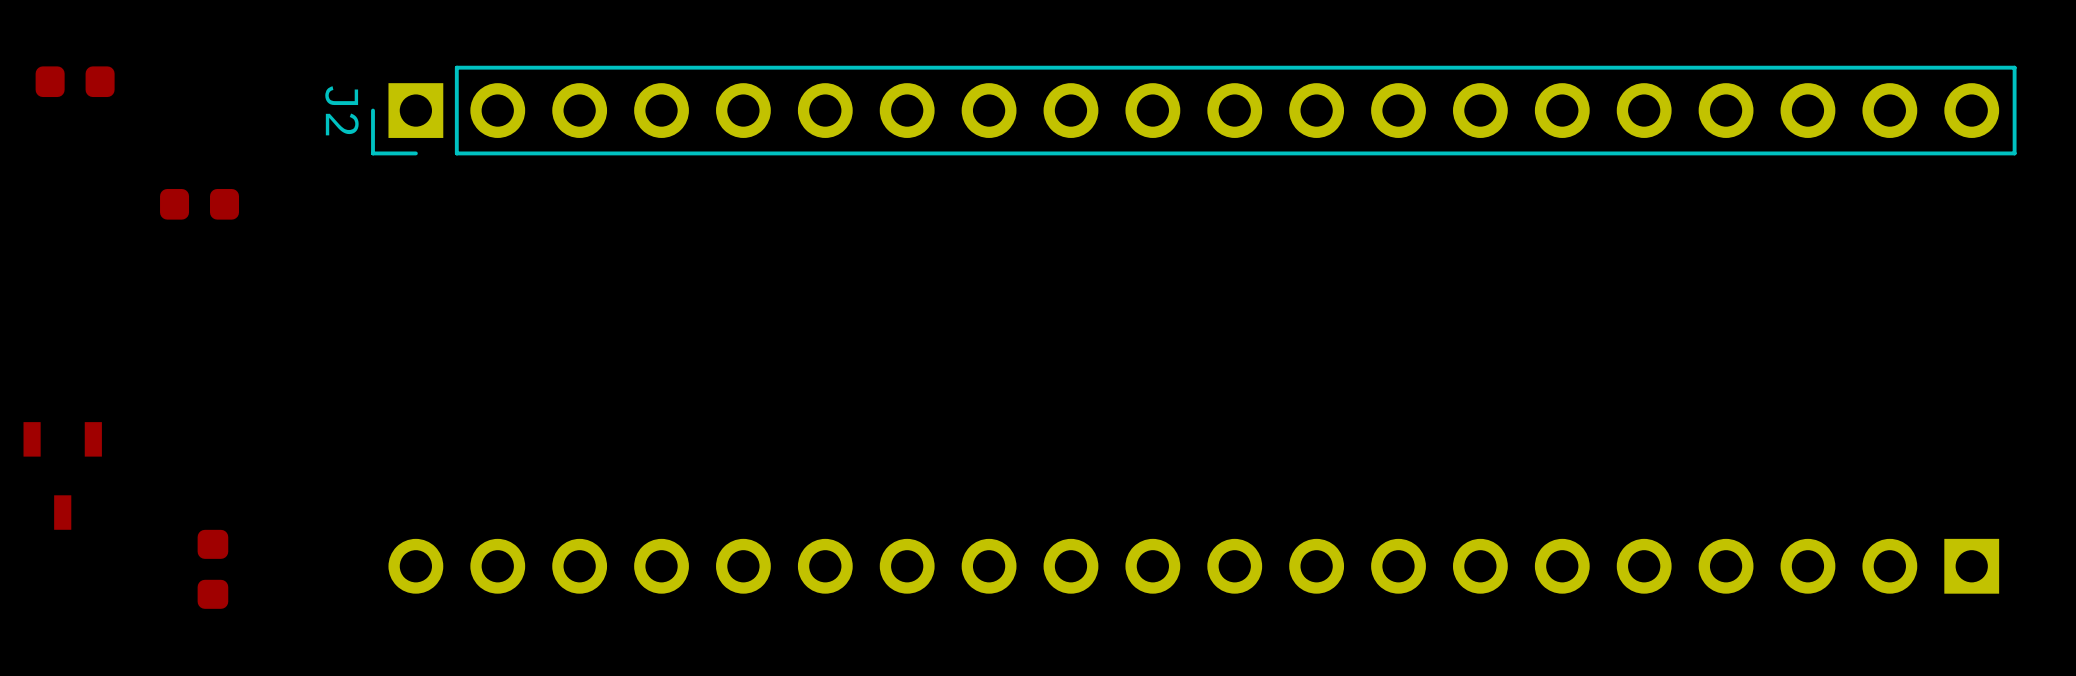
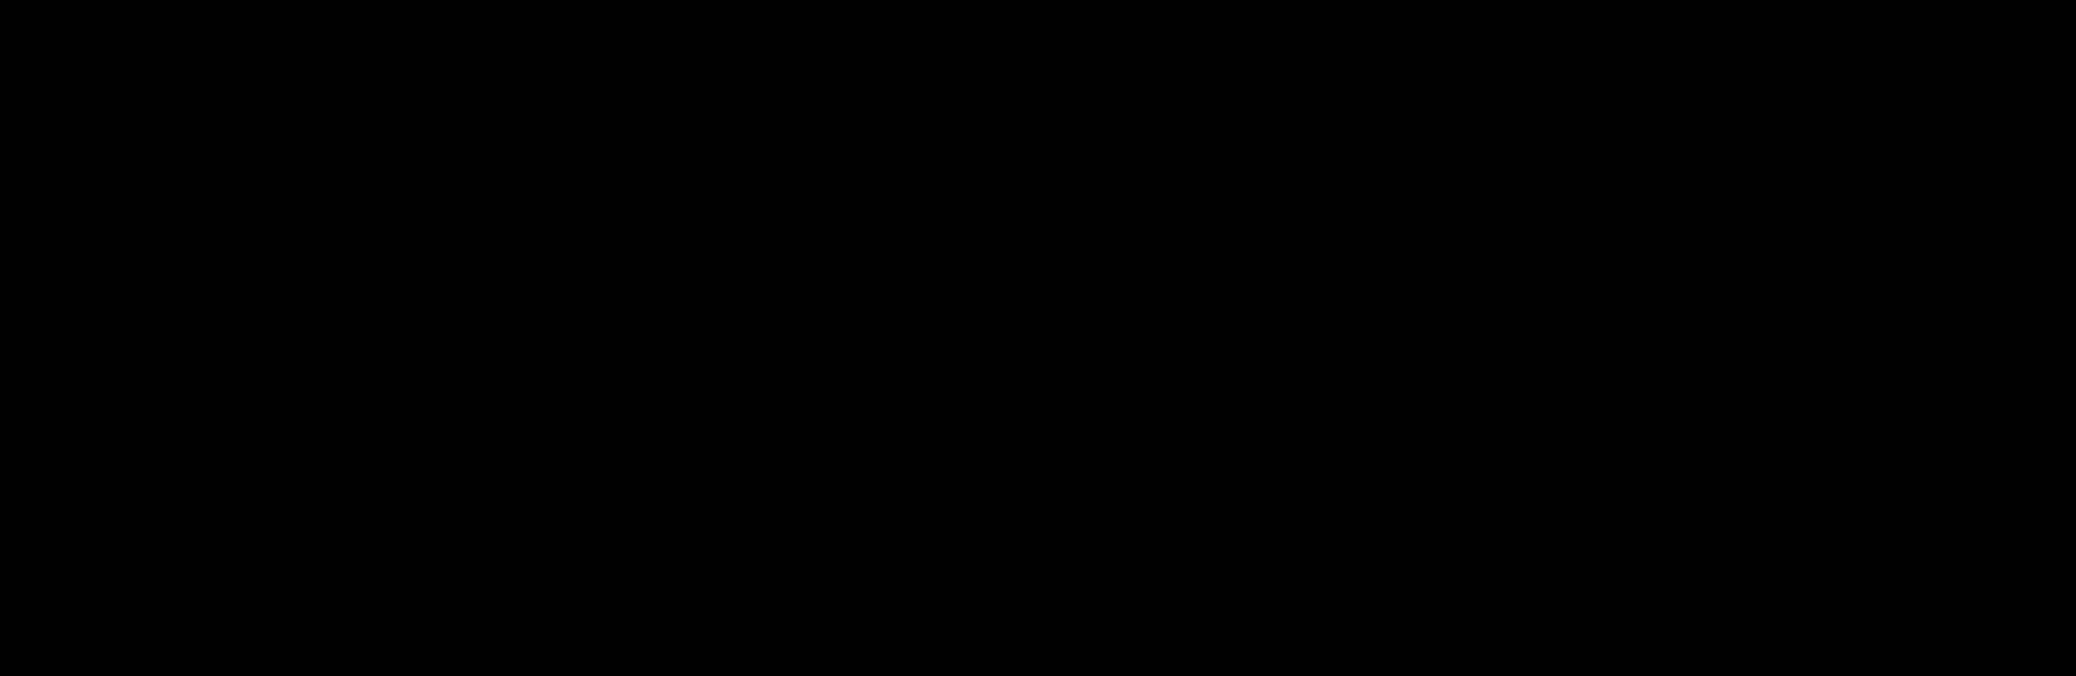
part: (75, 81) -> none
J2: (1193, 110) -> none
part: (199, 204) -> none
part: (62, 475) -> none
part: (1193, 566) -> none
part: (212, 569) -> none

